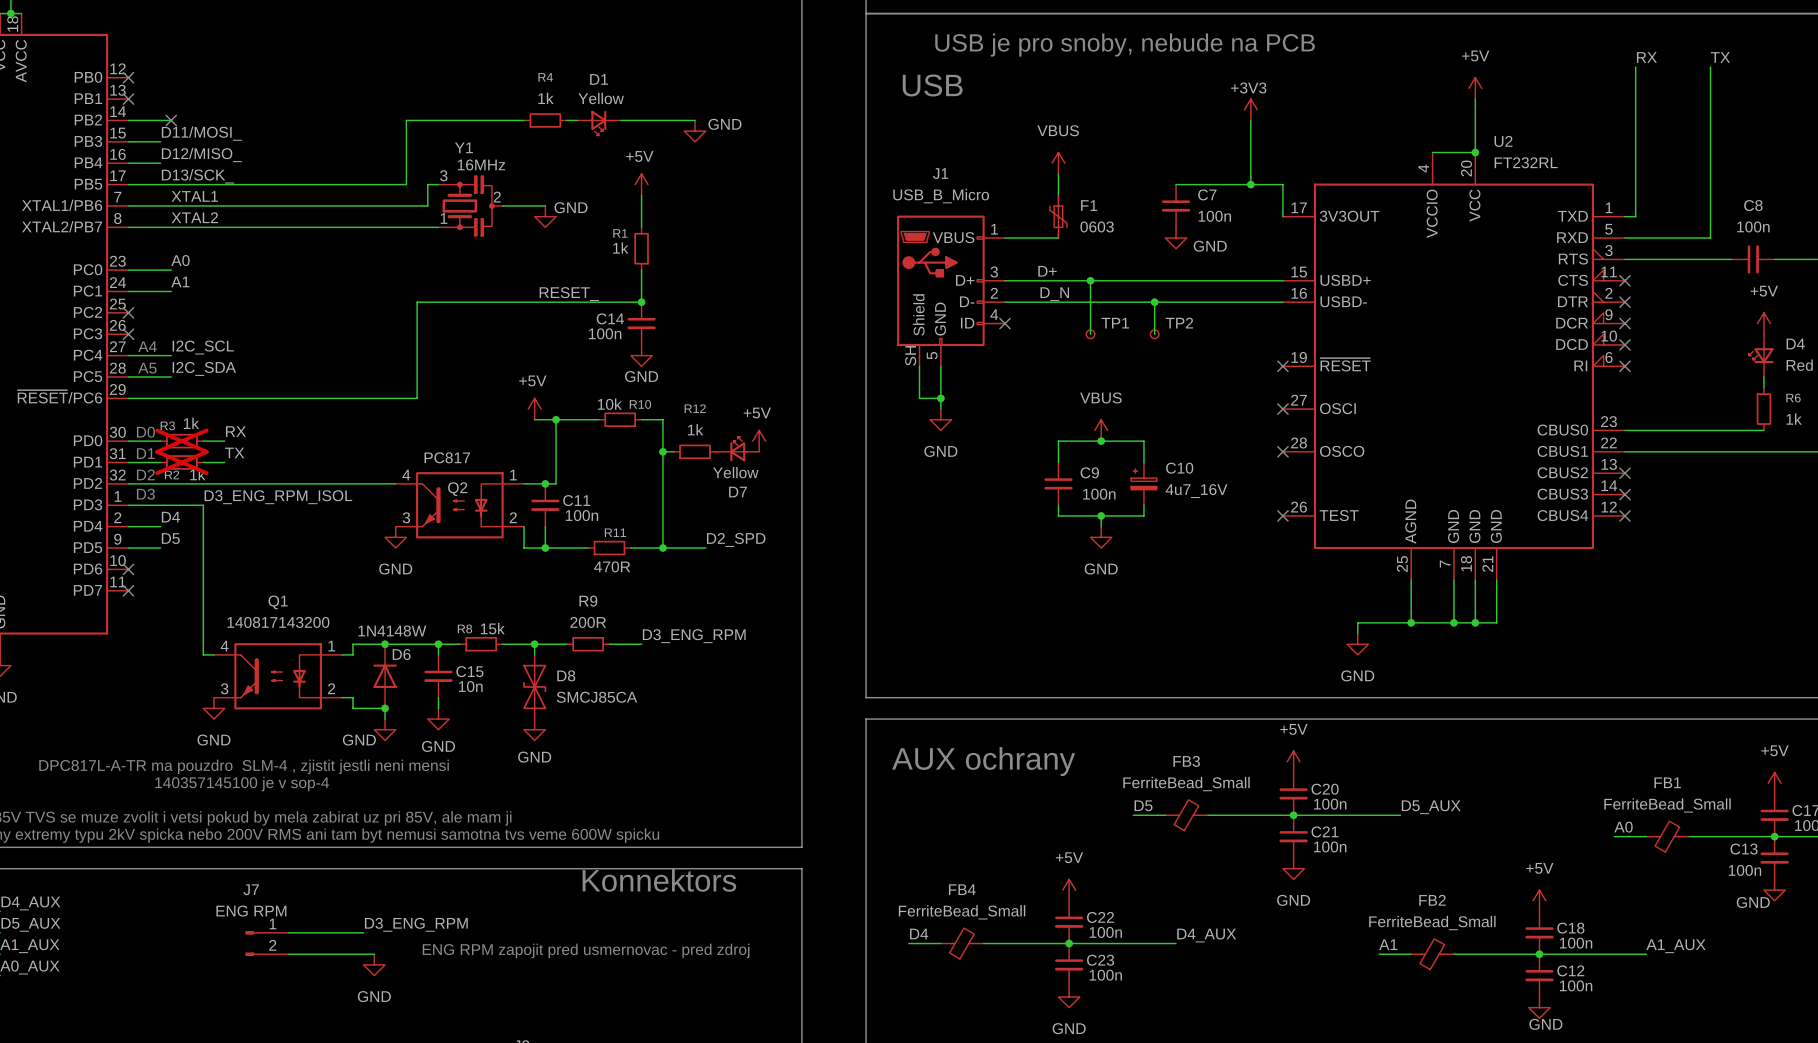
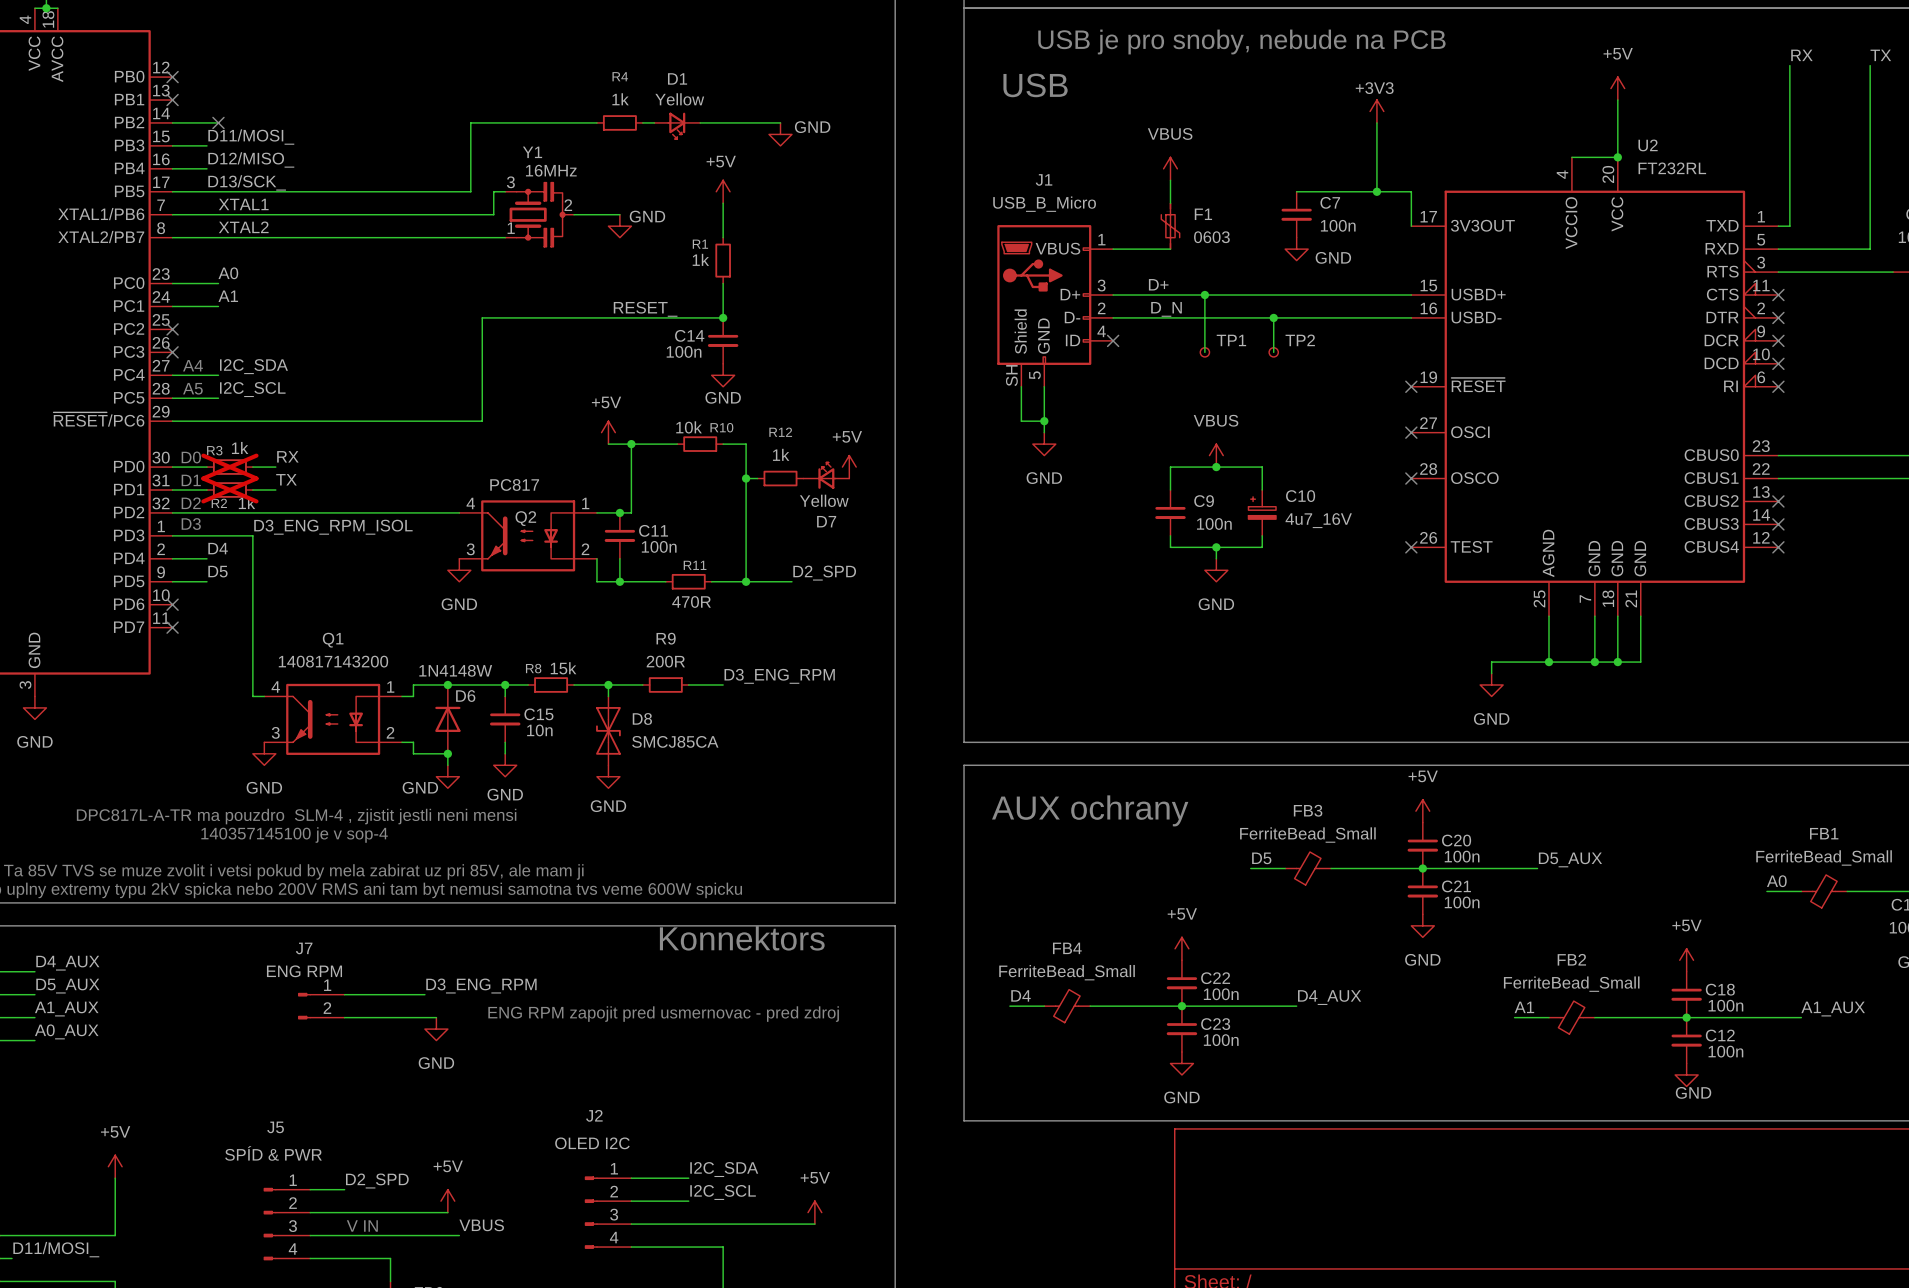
label: I2C_SCL (203, 347) -> I2C_SDA (253, 366)
label: I2C_SDA (204, 368) -> I2C_SCL (252, 389)

